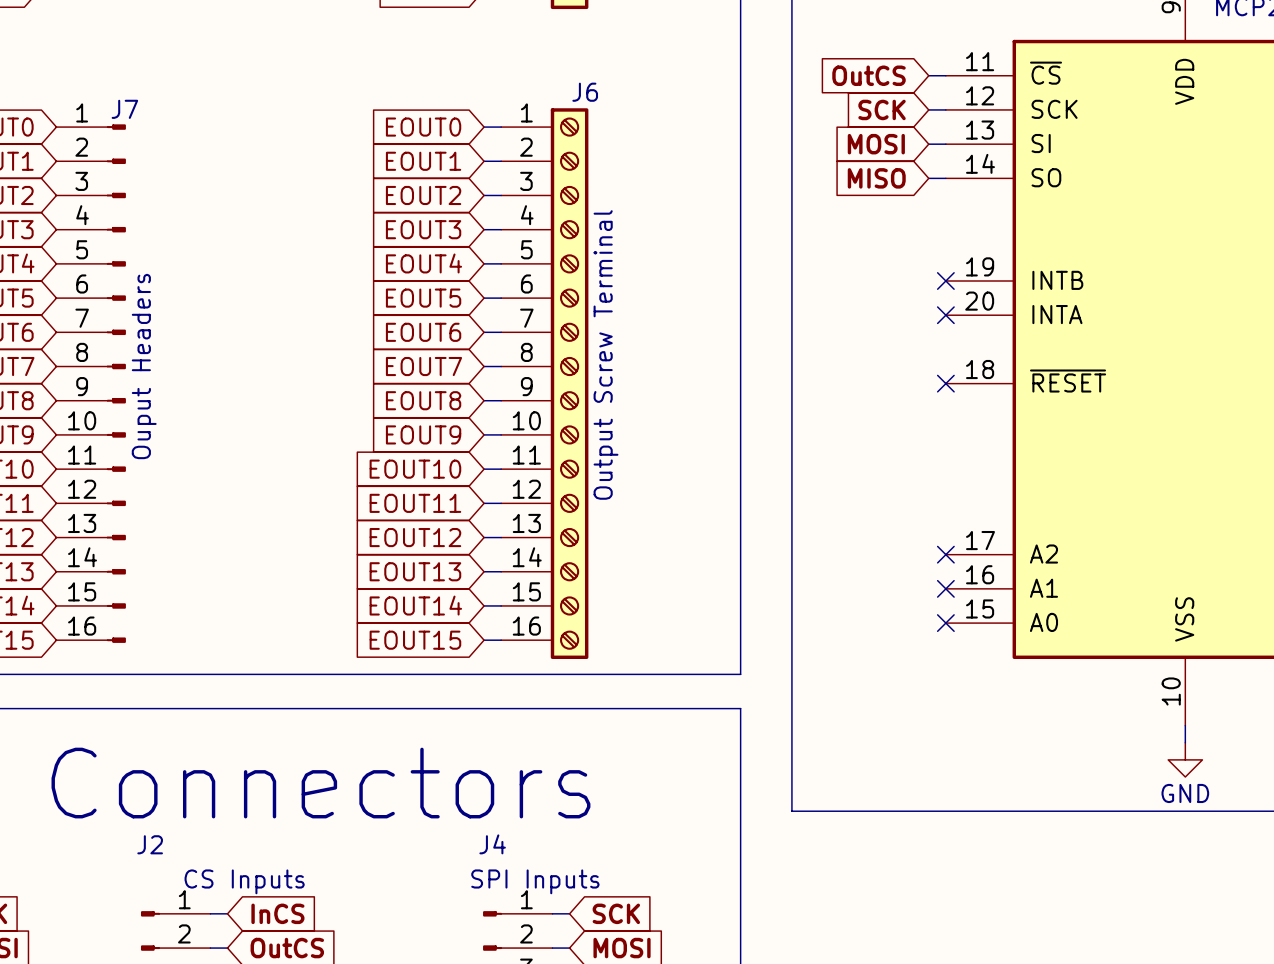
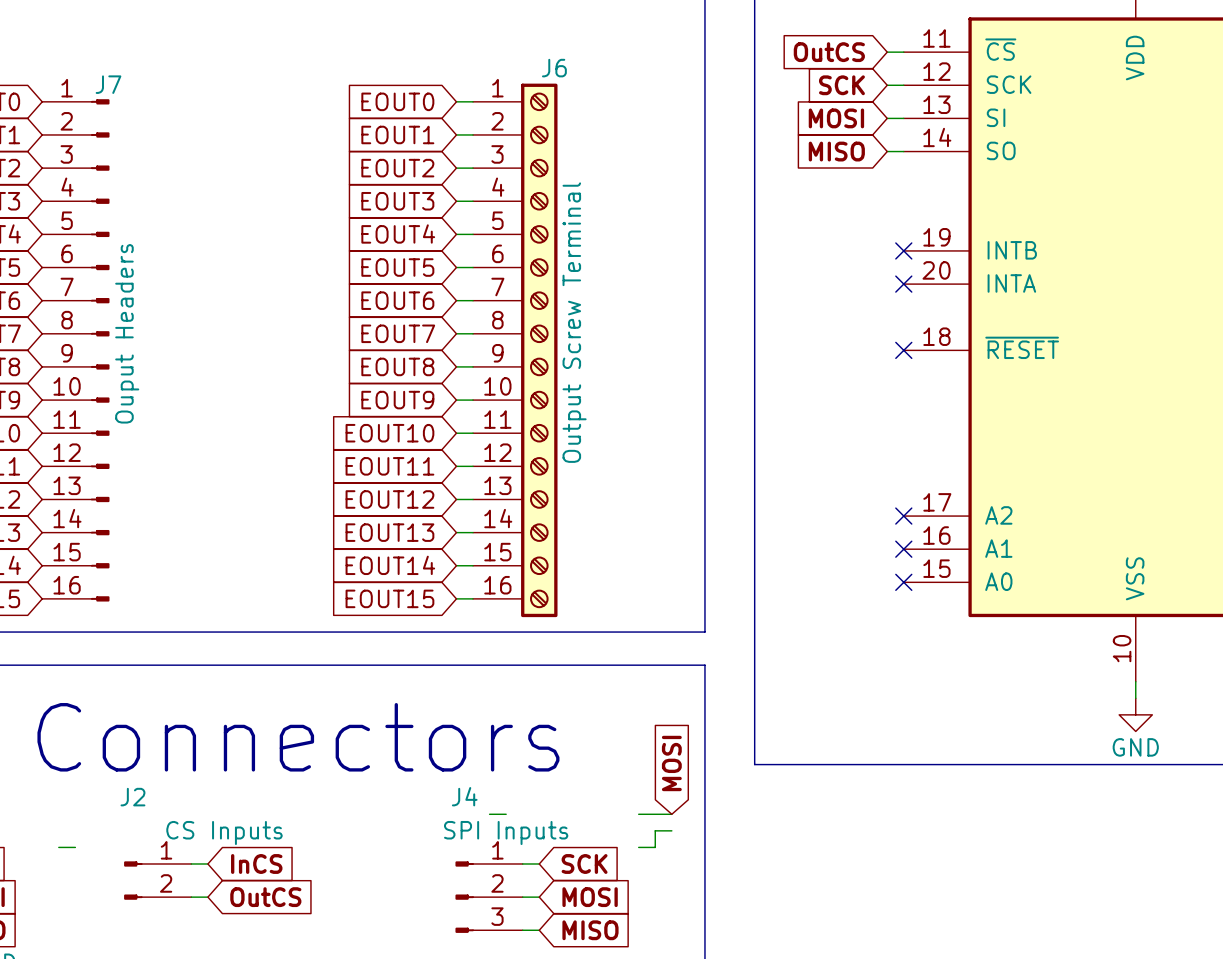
global label: none -> MOSI (671, 763)
wire: none -> (489, 814) (506, 814)
wire: none -> (638, 814) (671, 814)
wire: none -> (671, 830) (655, 830) (655, 847) (638, 847)
wire: none -> (58, 847) (75, 847)

